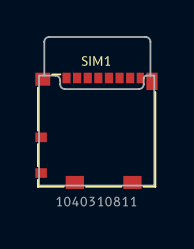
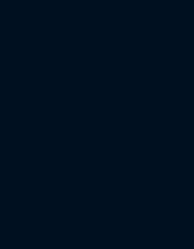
SIM1: 1040310811 (96, 112) -> none

